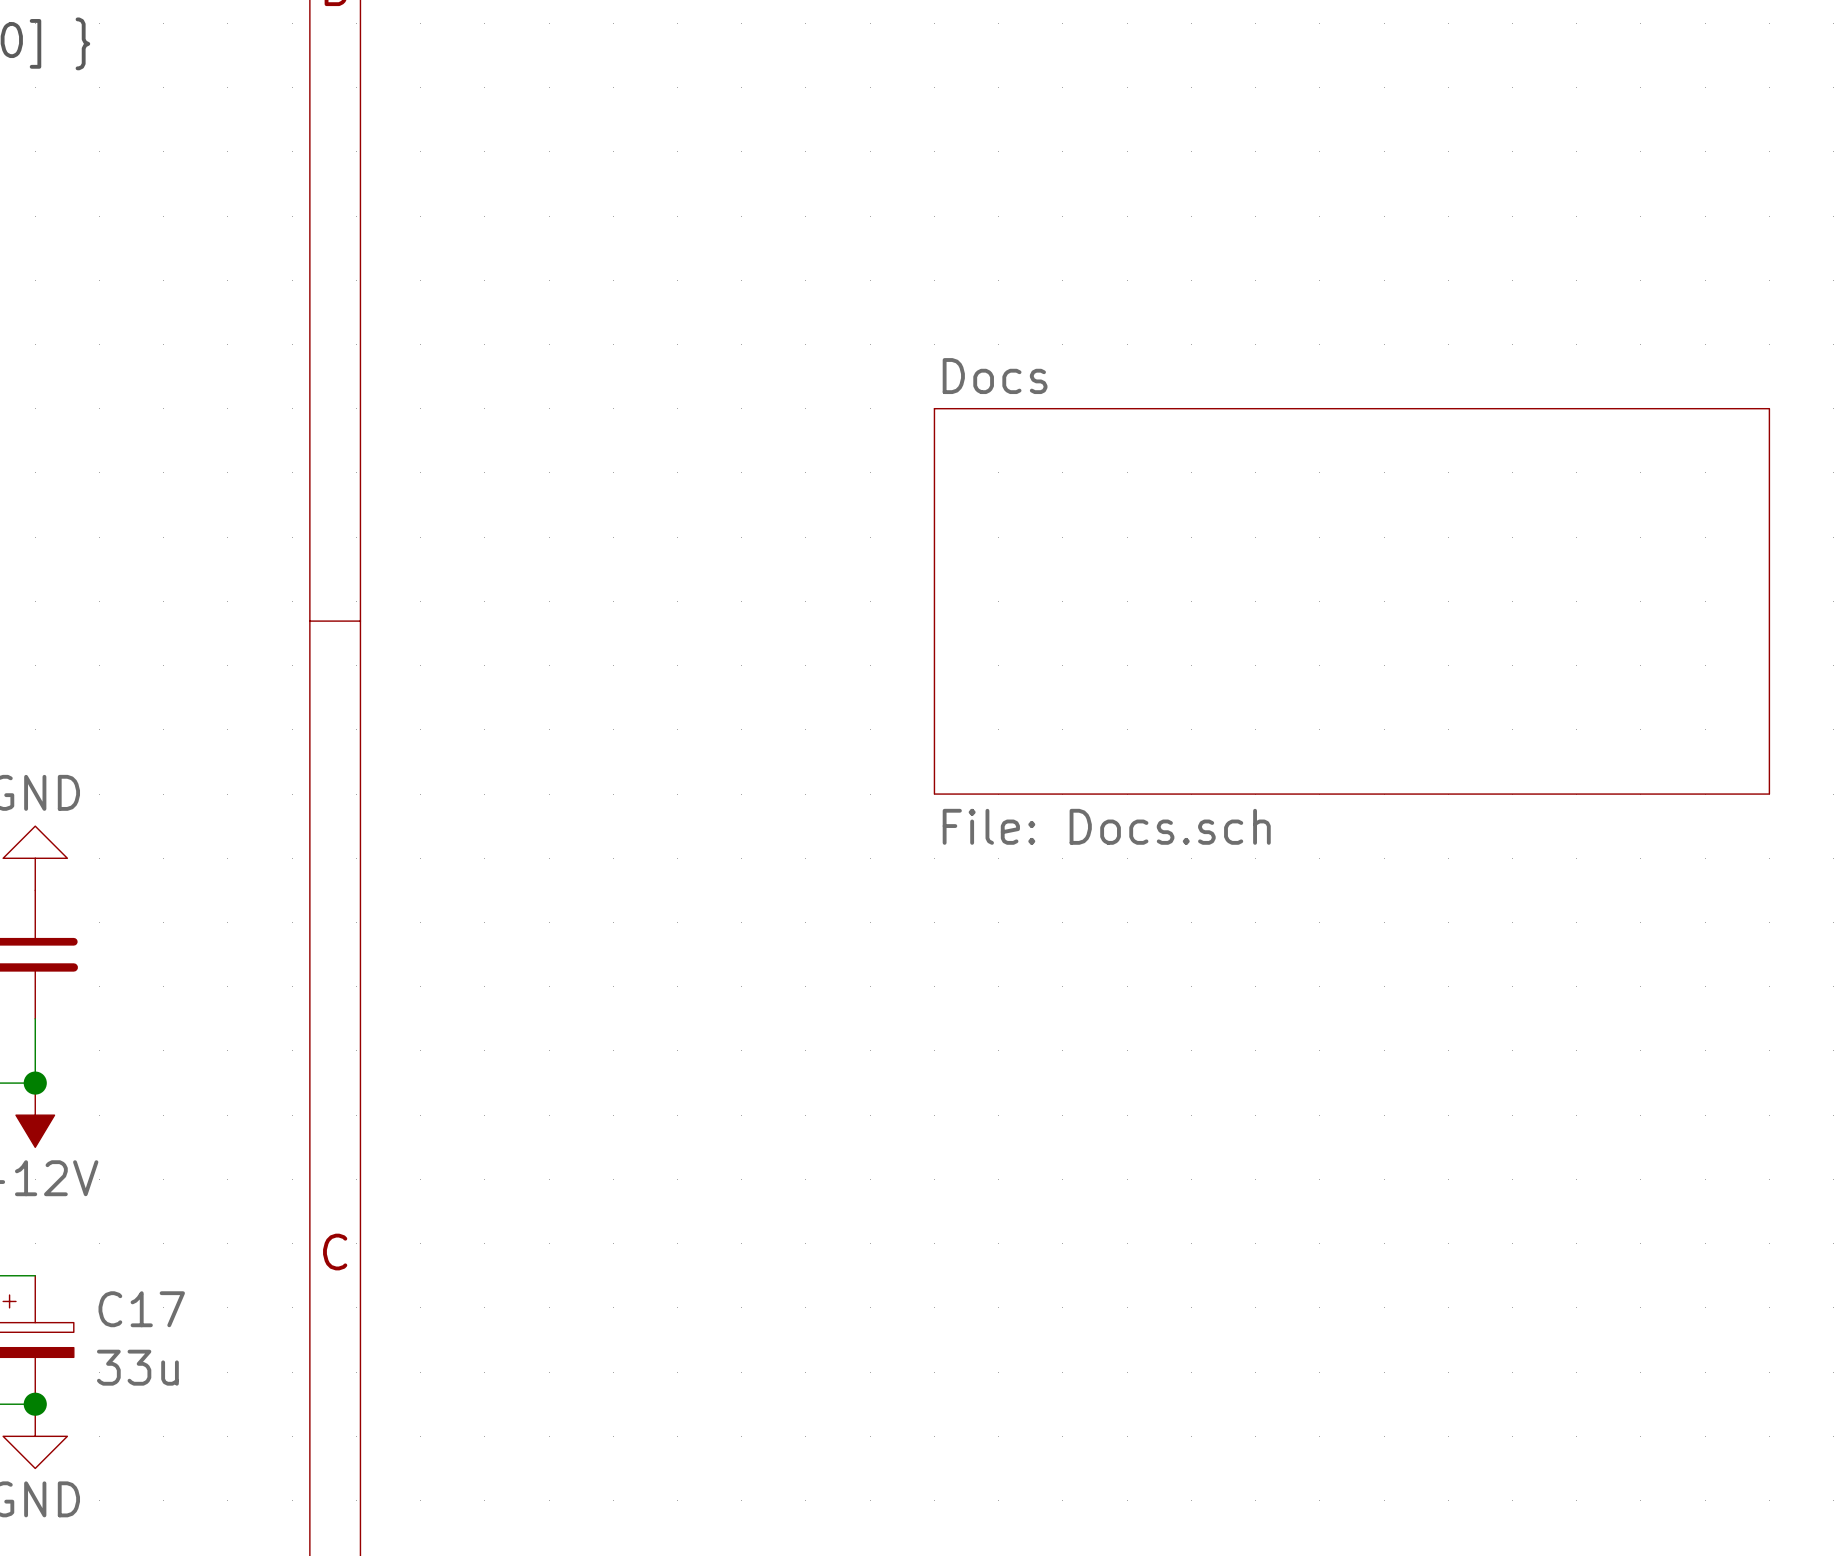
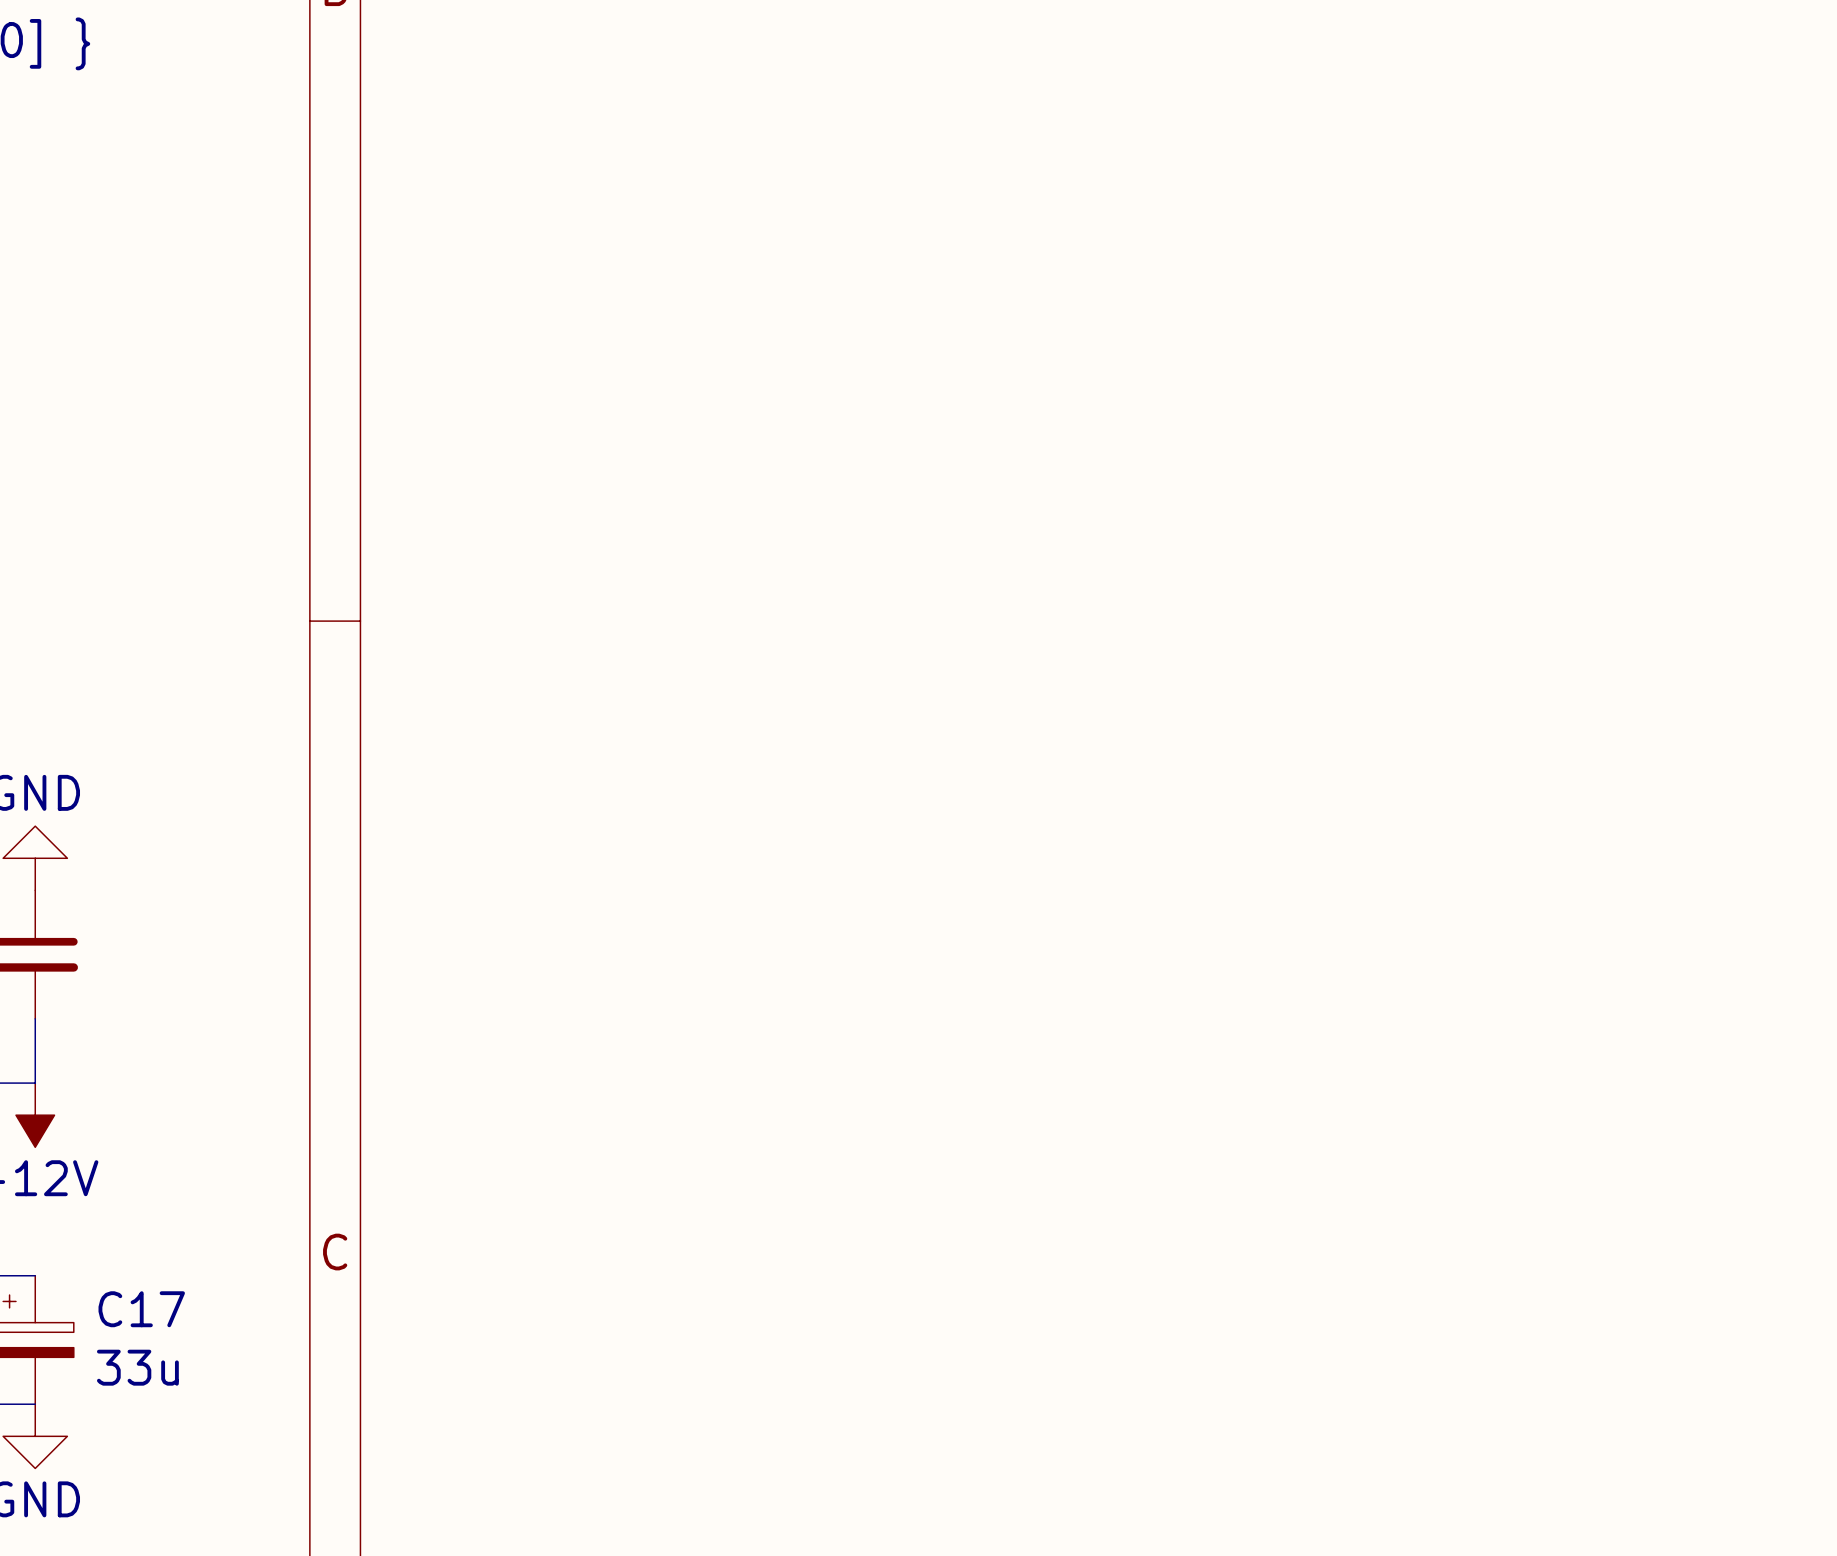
sheet Docs: File: Docs.sch (1351, 601) -> none
junction: (35, 1083) -> none
junction: (35, 1404) -> none

